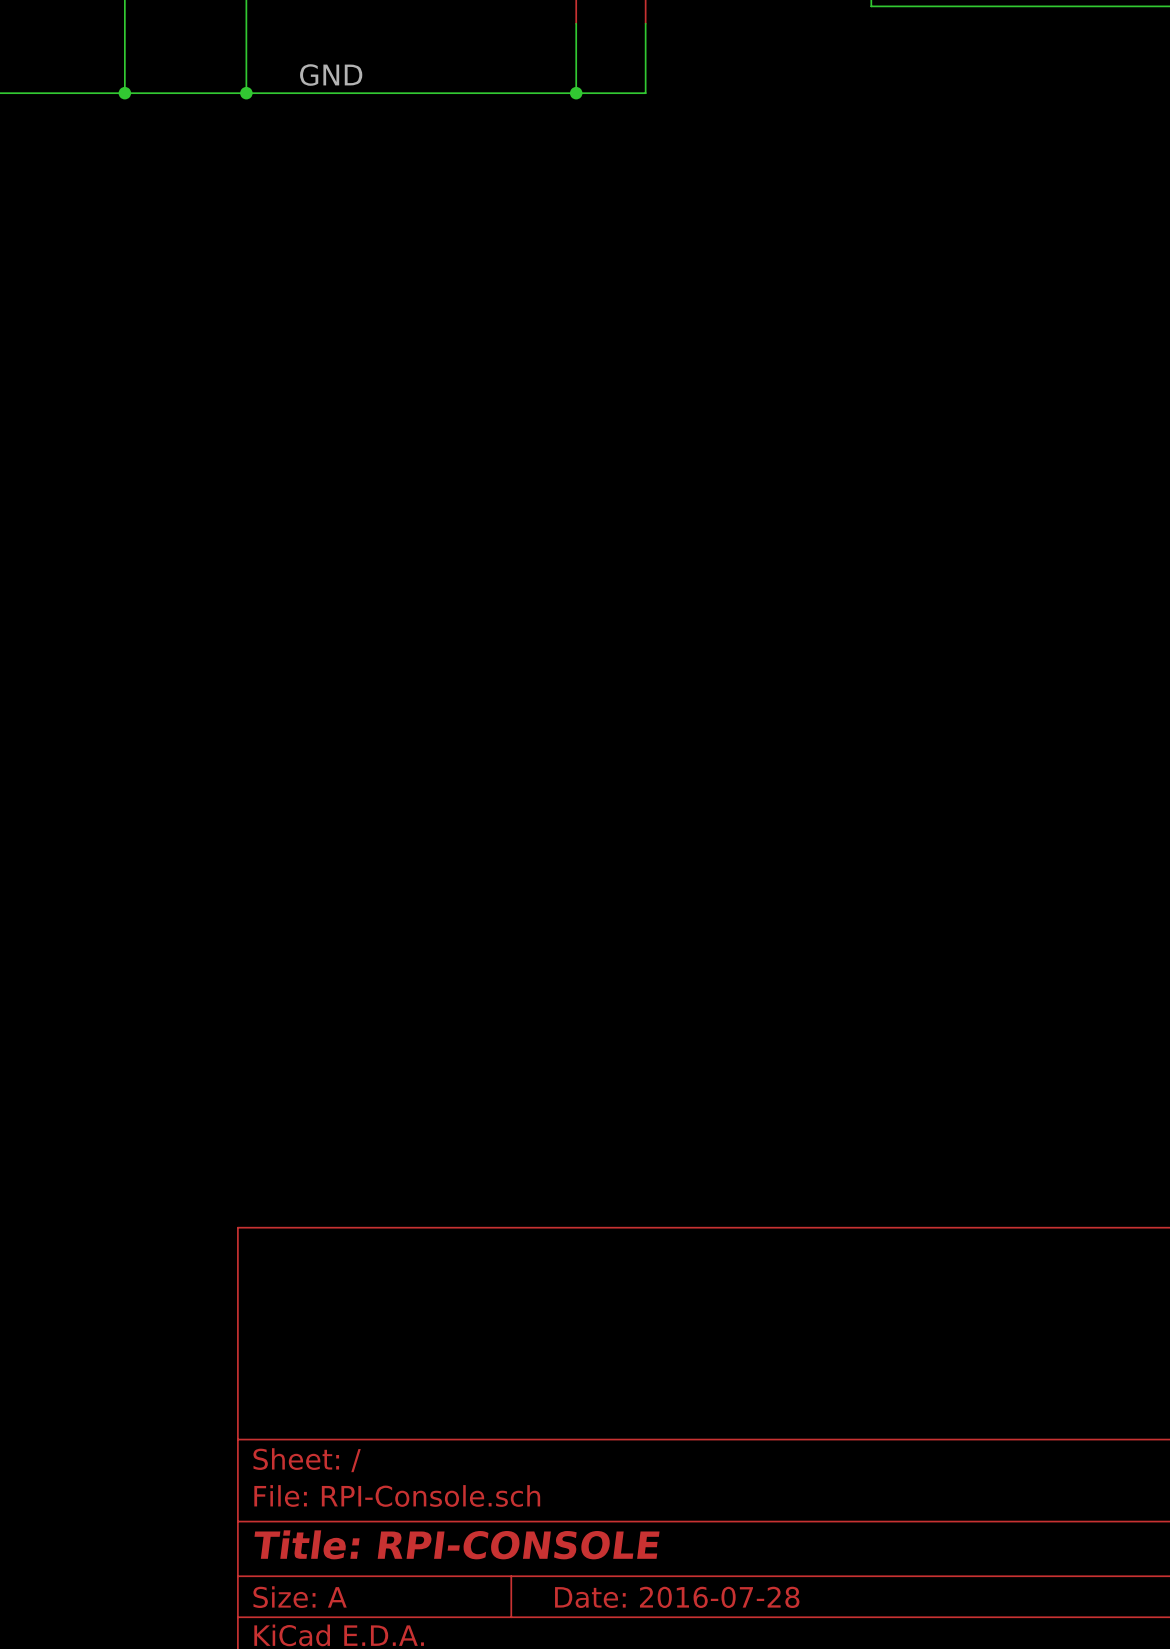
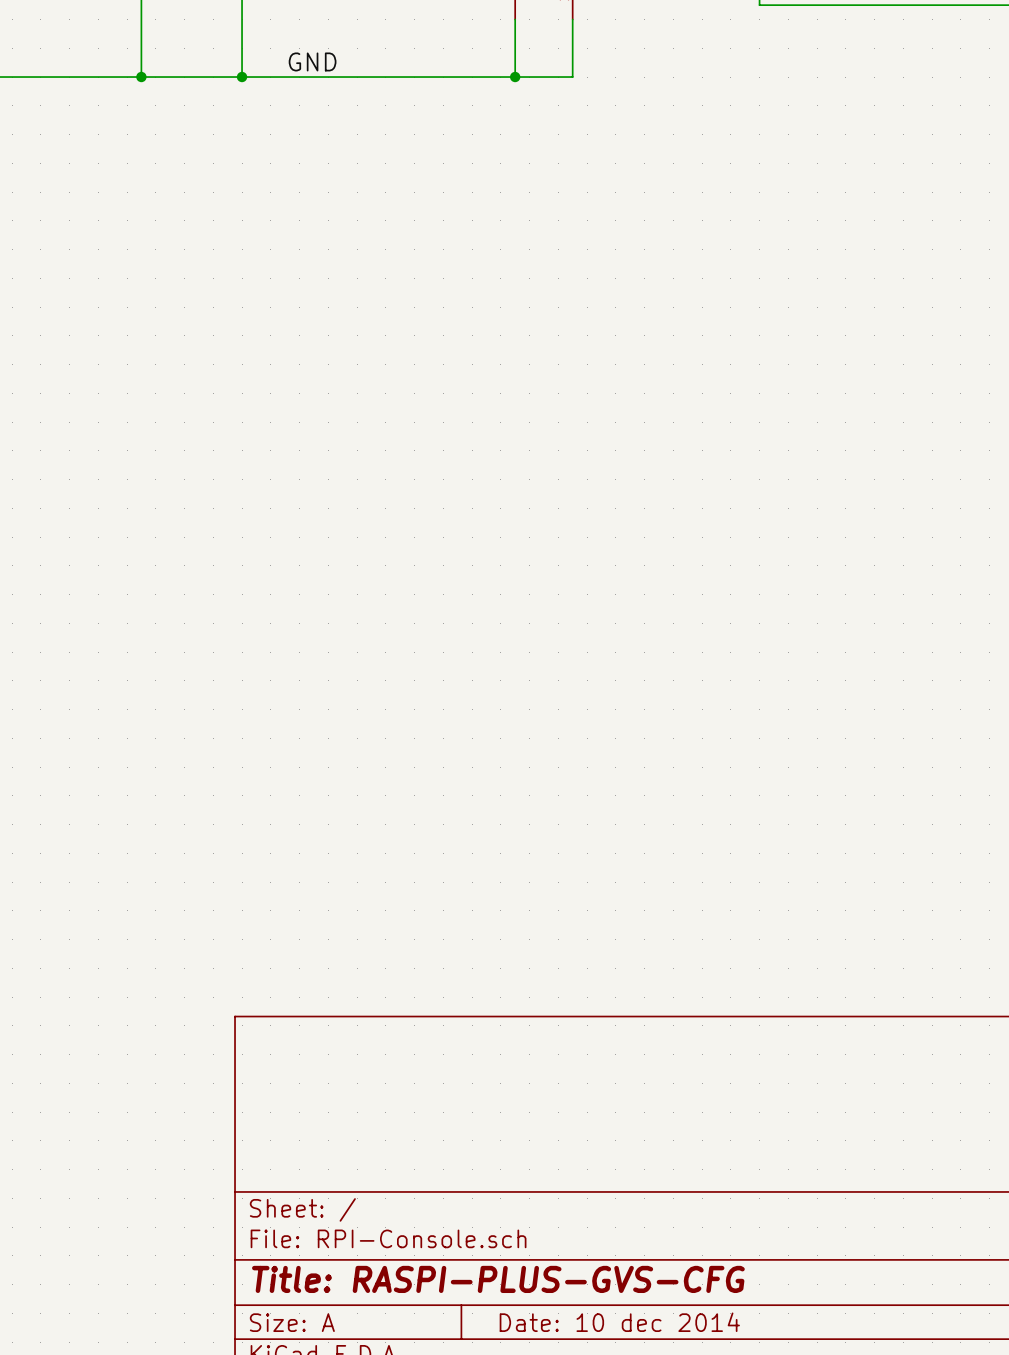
title block: Title: RPI-CONSOLE (457, 1544) -> Title: RASPI-PLUS-GVS-CFG (498, 1279)
title block: Date: 2016-07-28 (677, 1597) -> Date: 10 dec 2014 (619, 1322)

